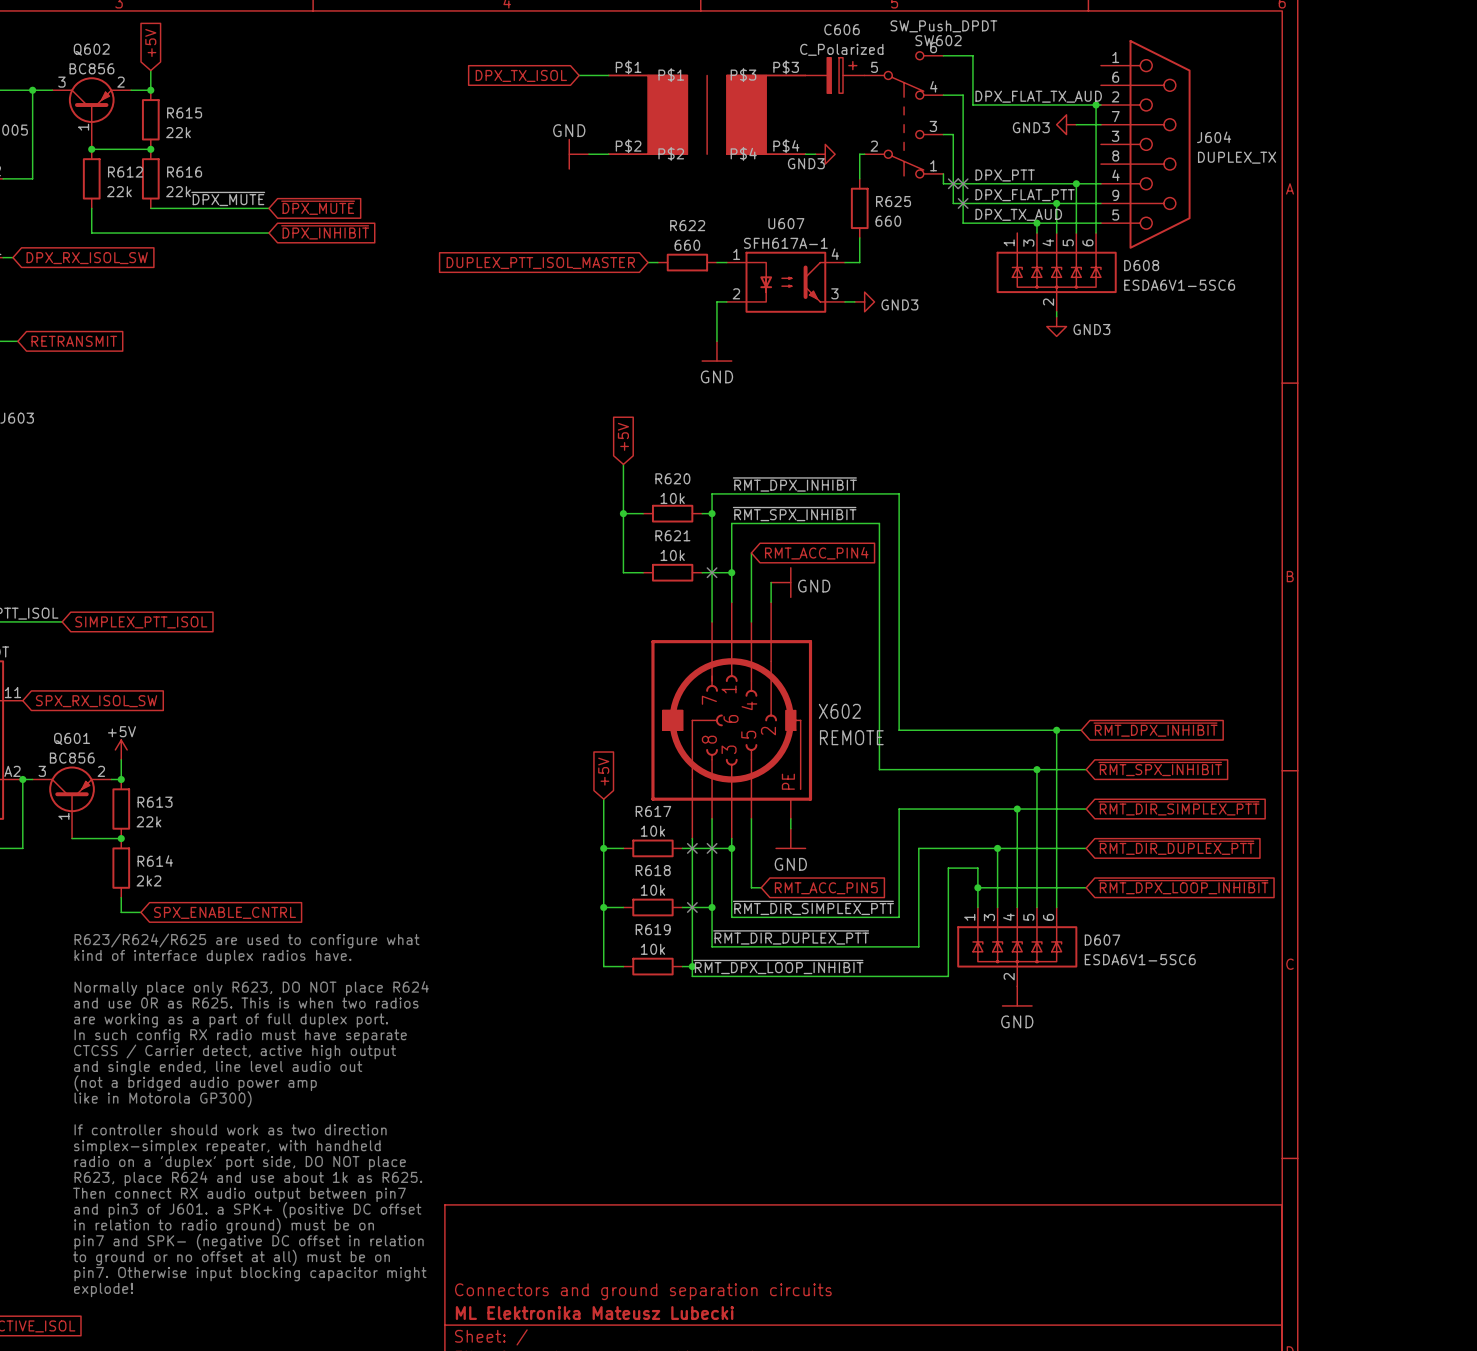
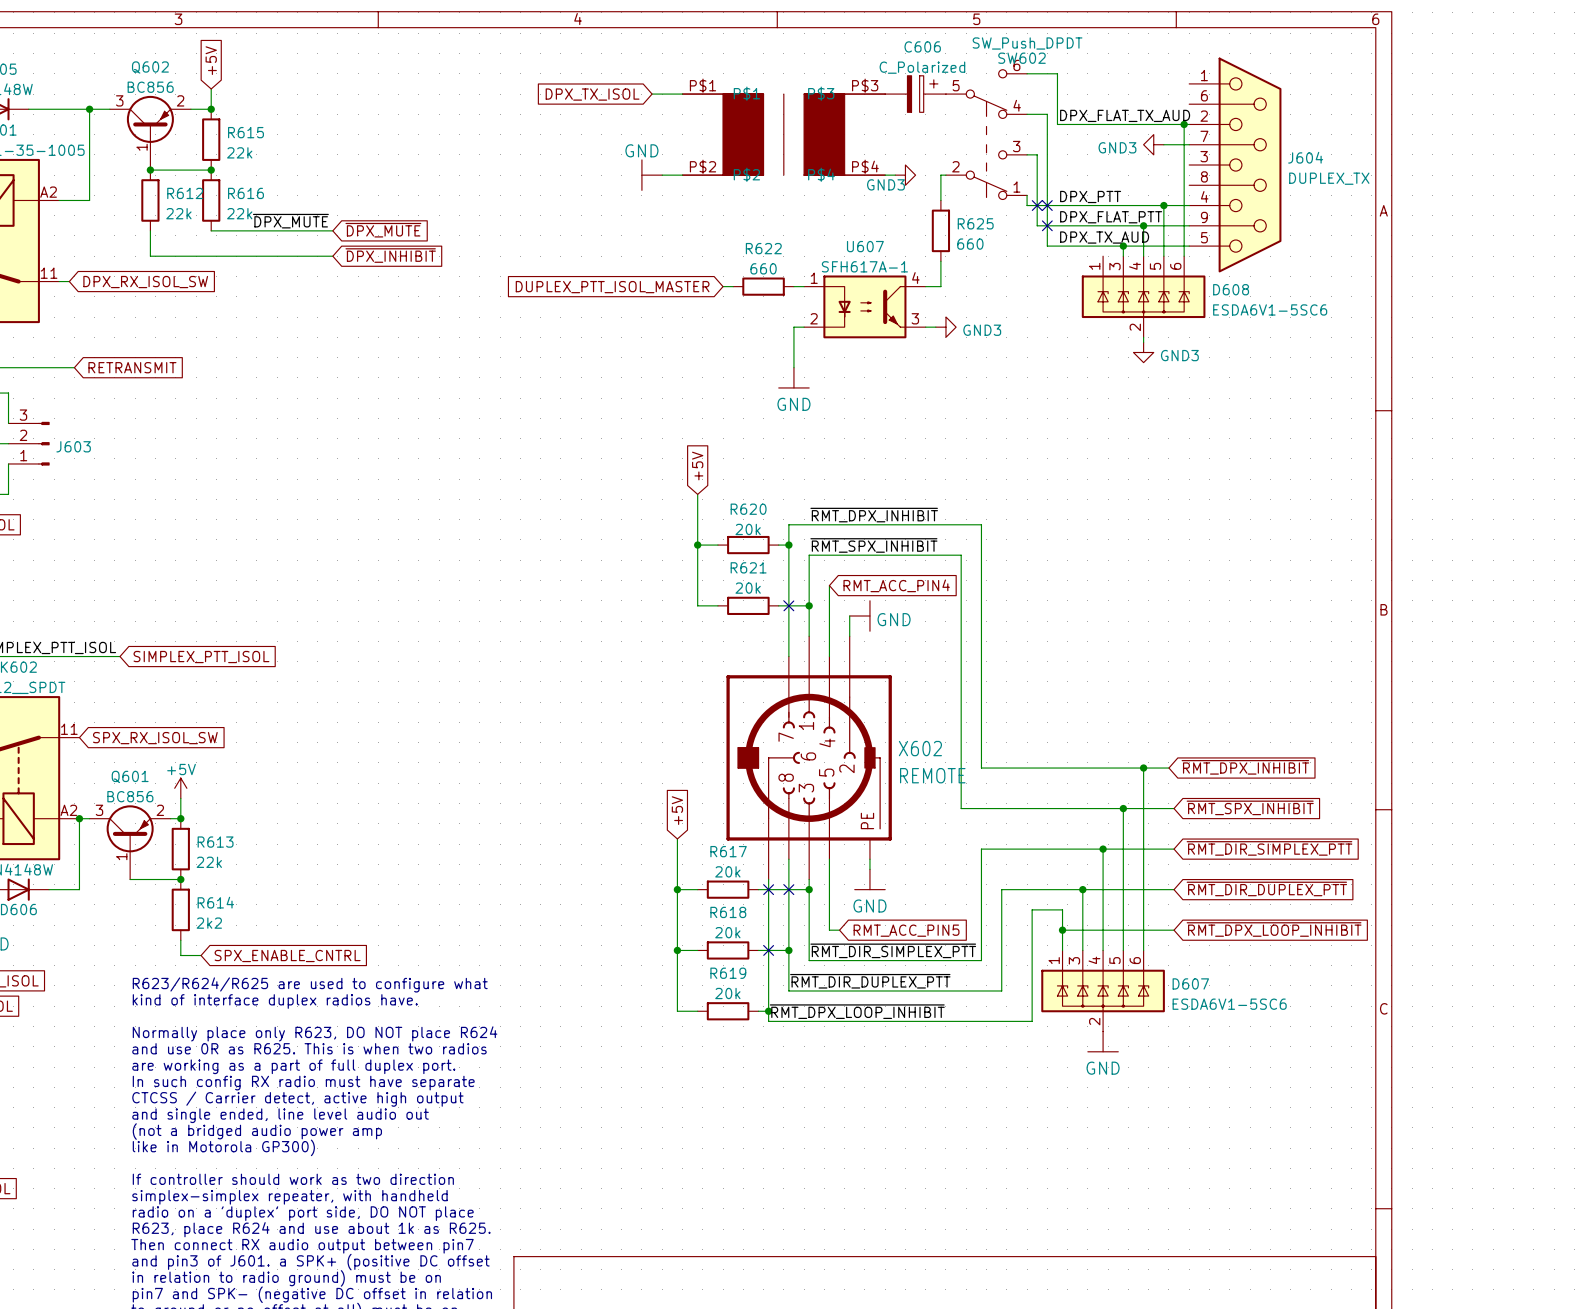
R620 value: 10k (672, 498) -> 20k (748, 529)
R621 value: 10k (672, 555) -> 20k (748, 588)
R617 value: 10k (652, 831) -> 20k (727, 871)
R618 value: 10k (652, 890) -> 20k (727, 932)
R619 value: 10k (652, 949) -> 20k (727, 993)

